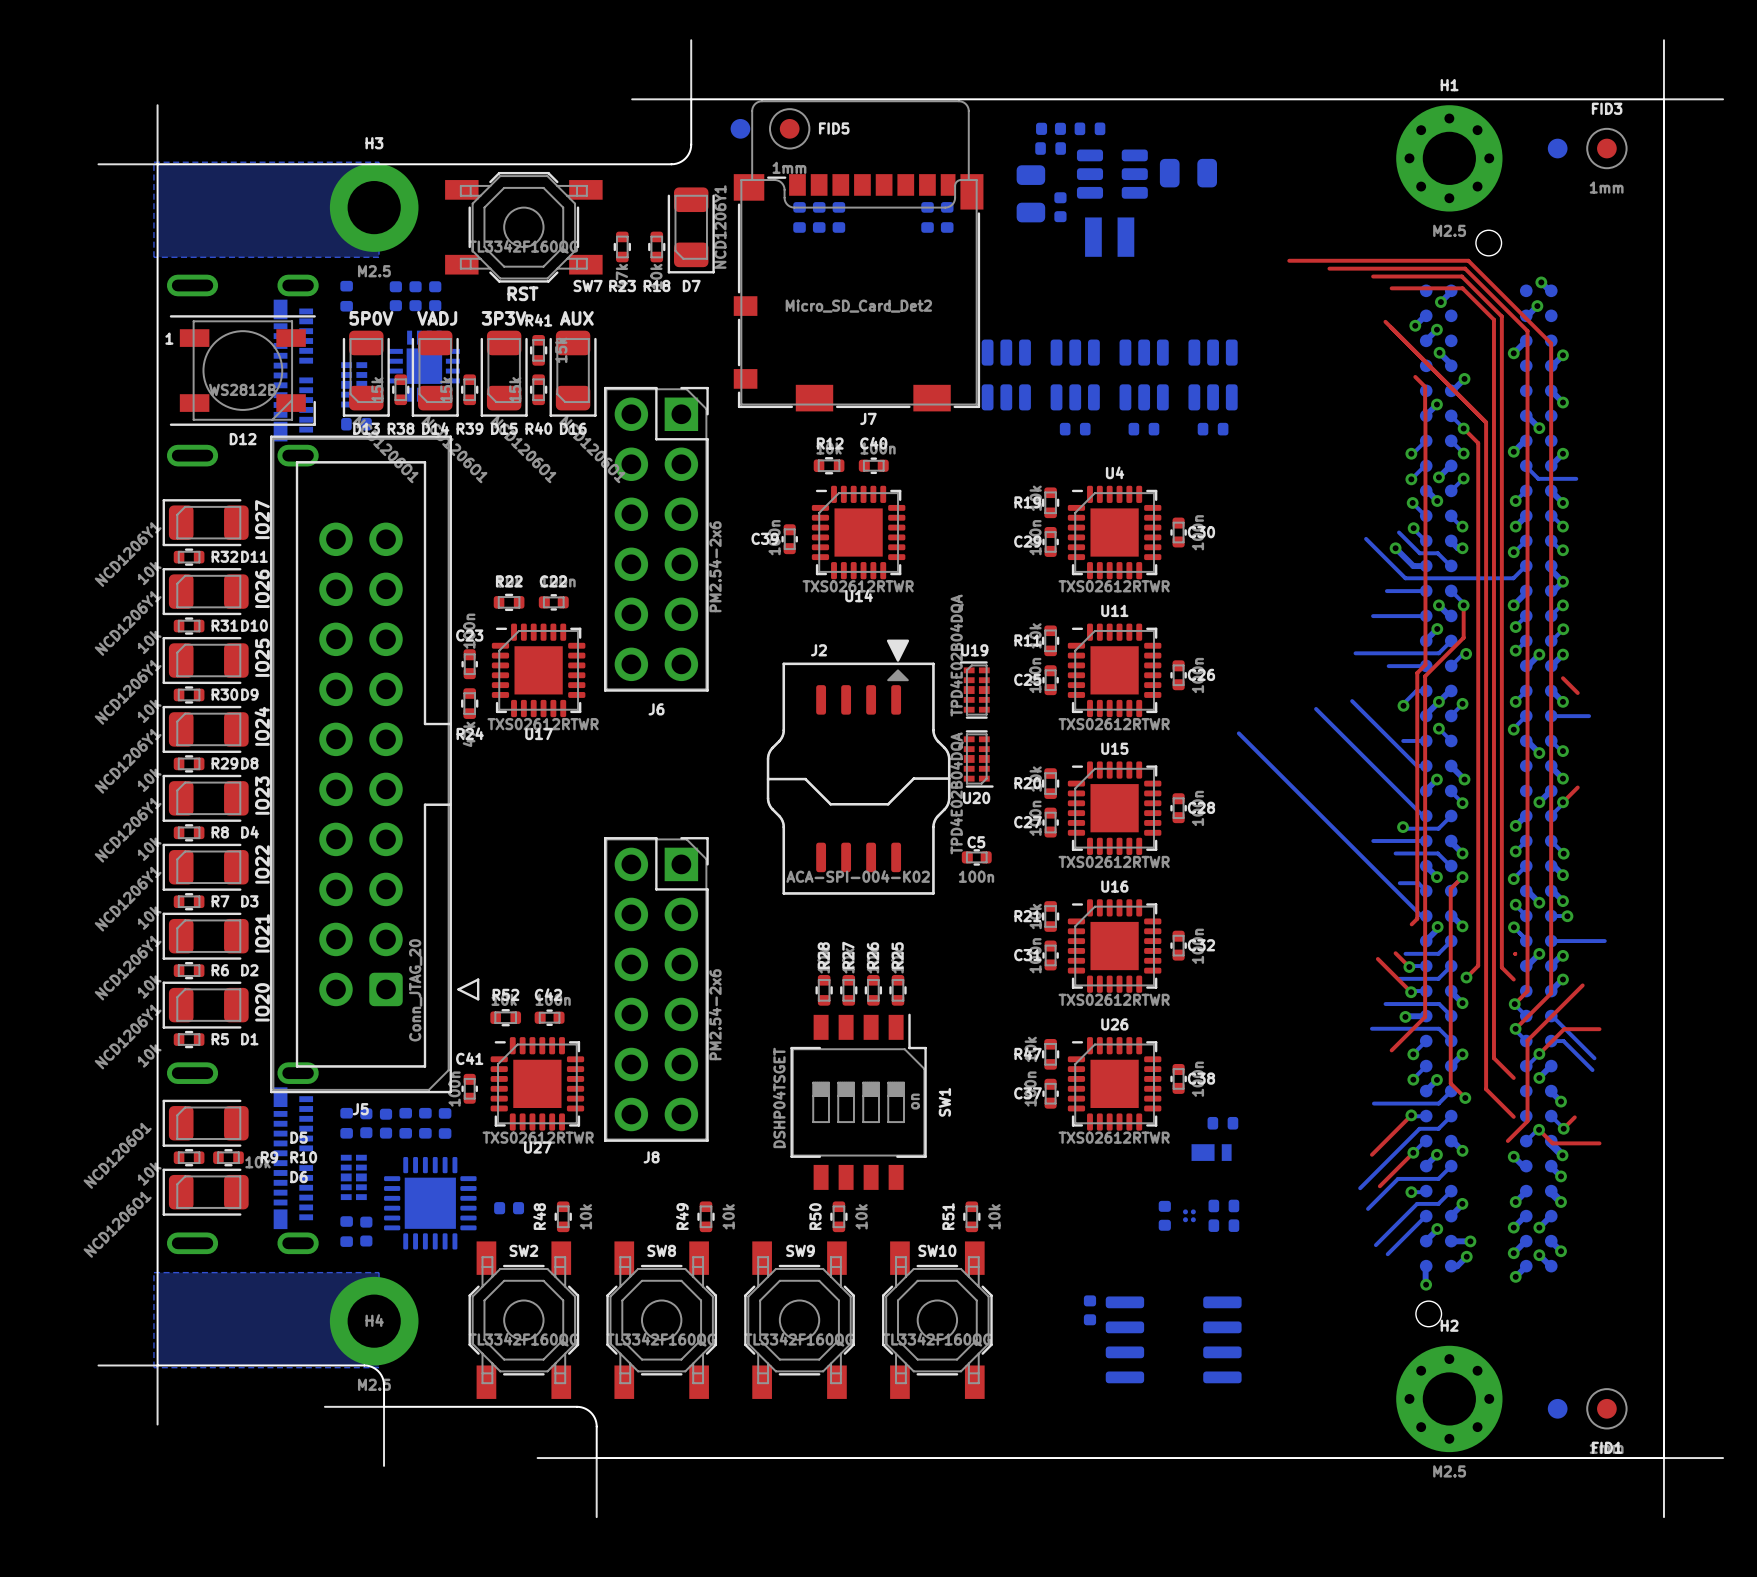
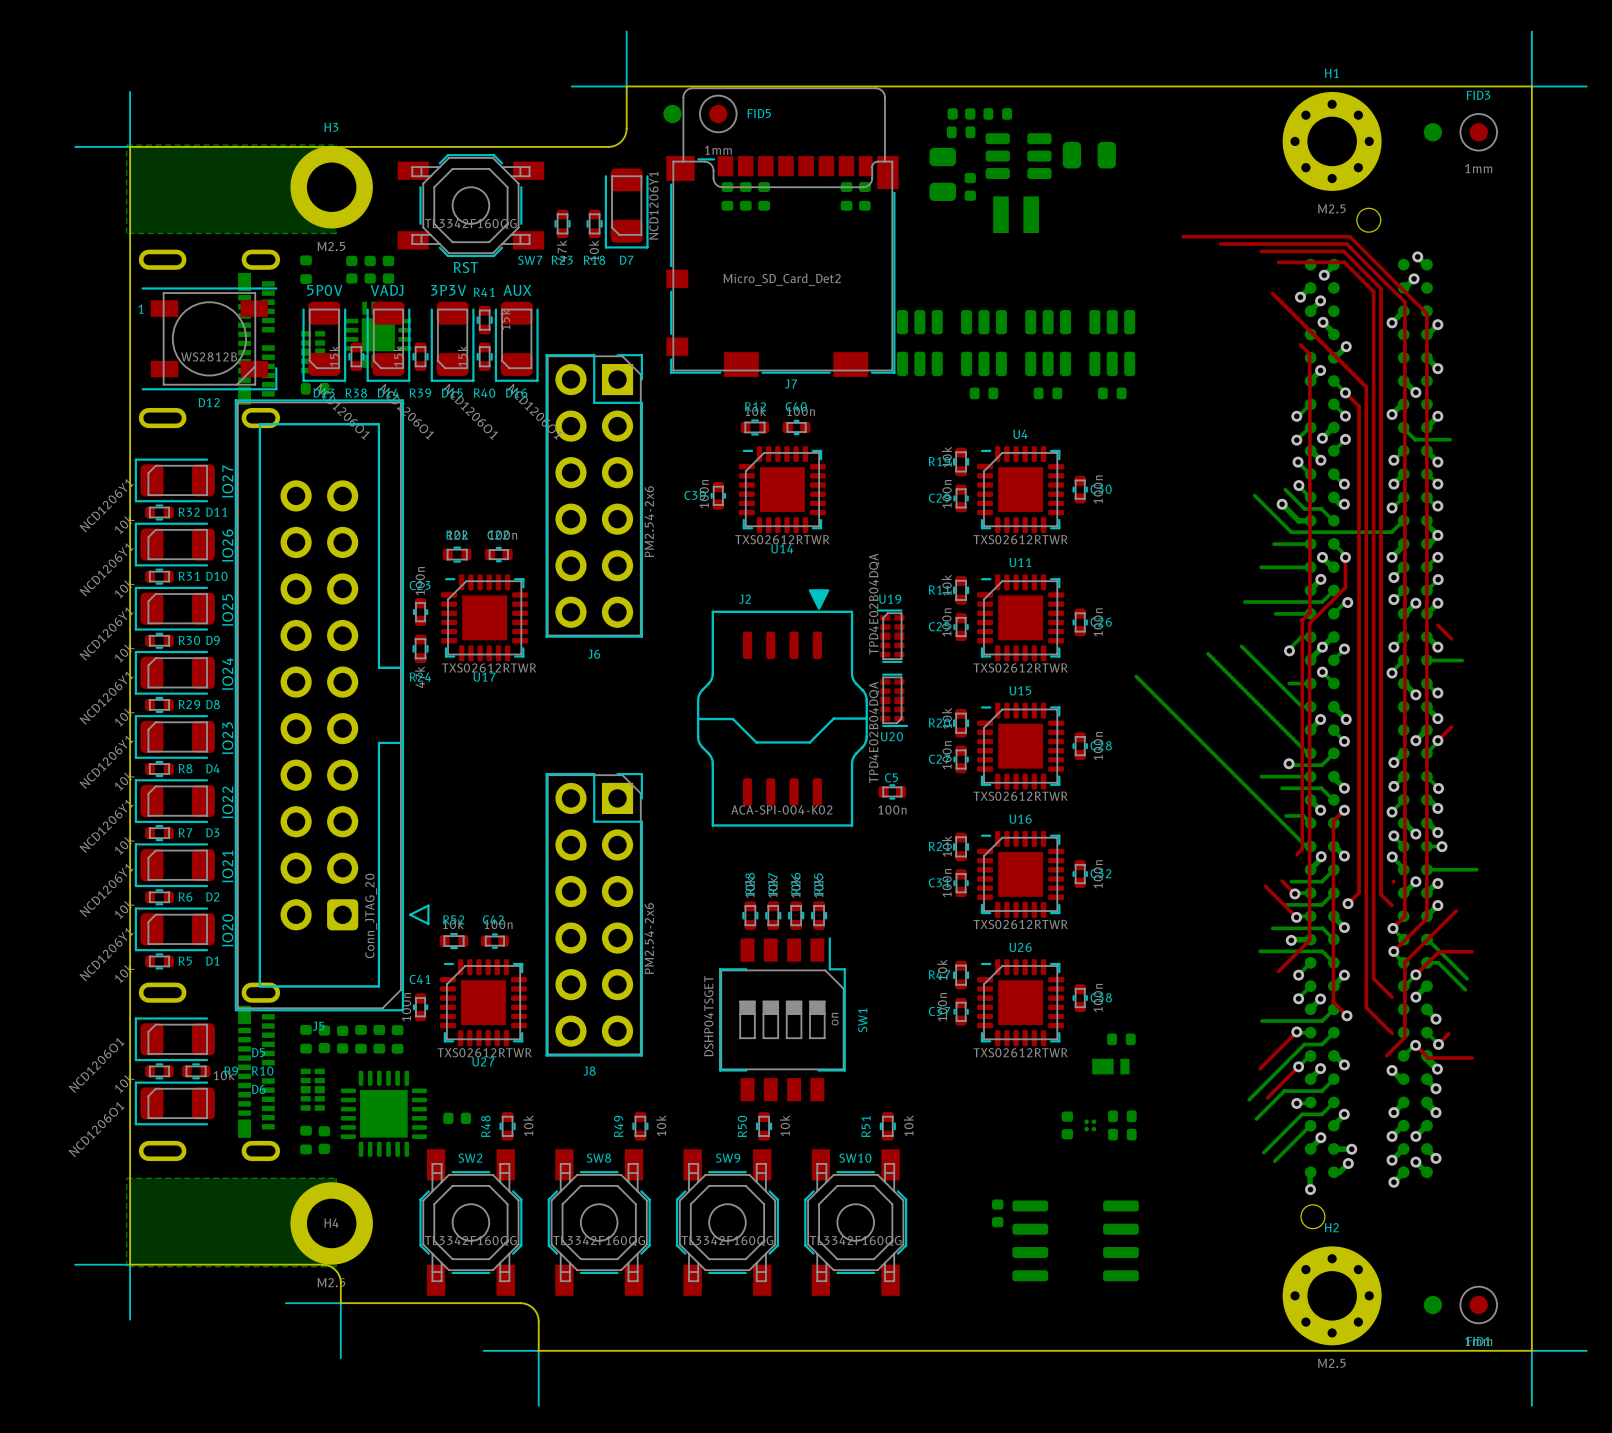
J2 footprint: [766, 639, 951, 895] -> [696, 589, 868, 827]

